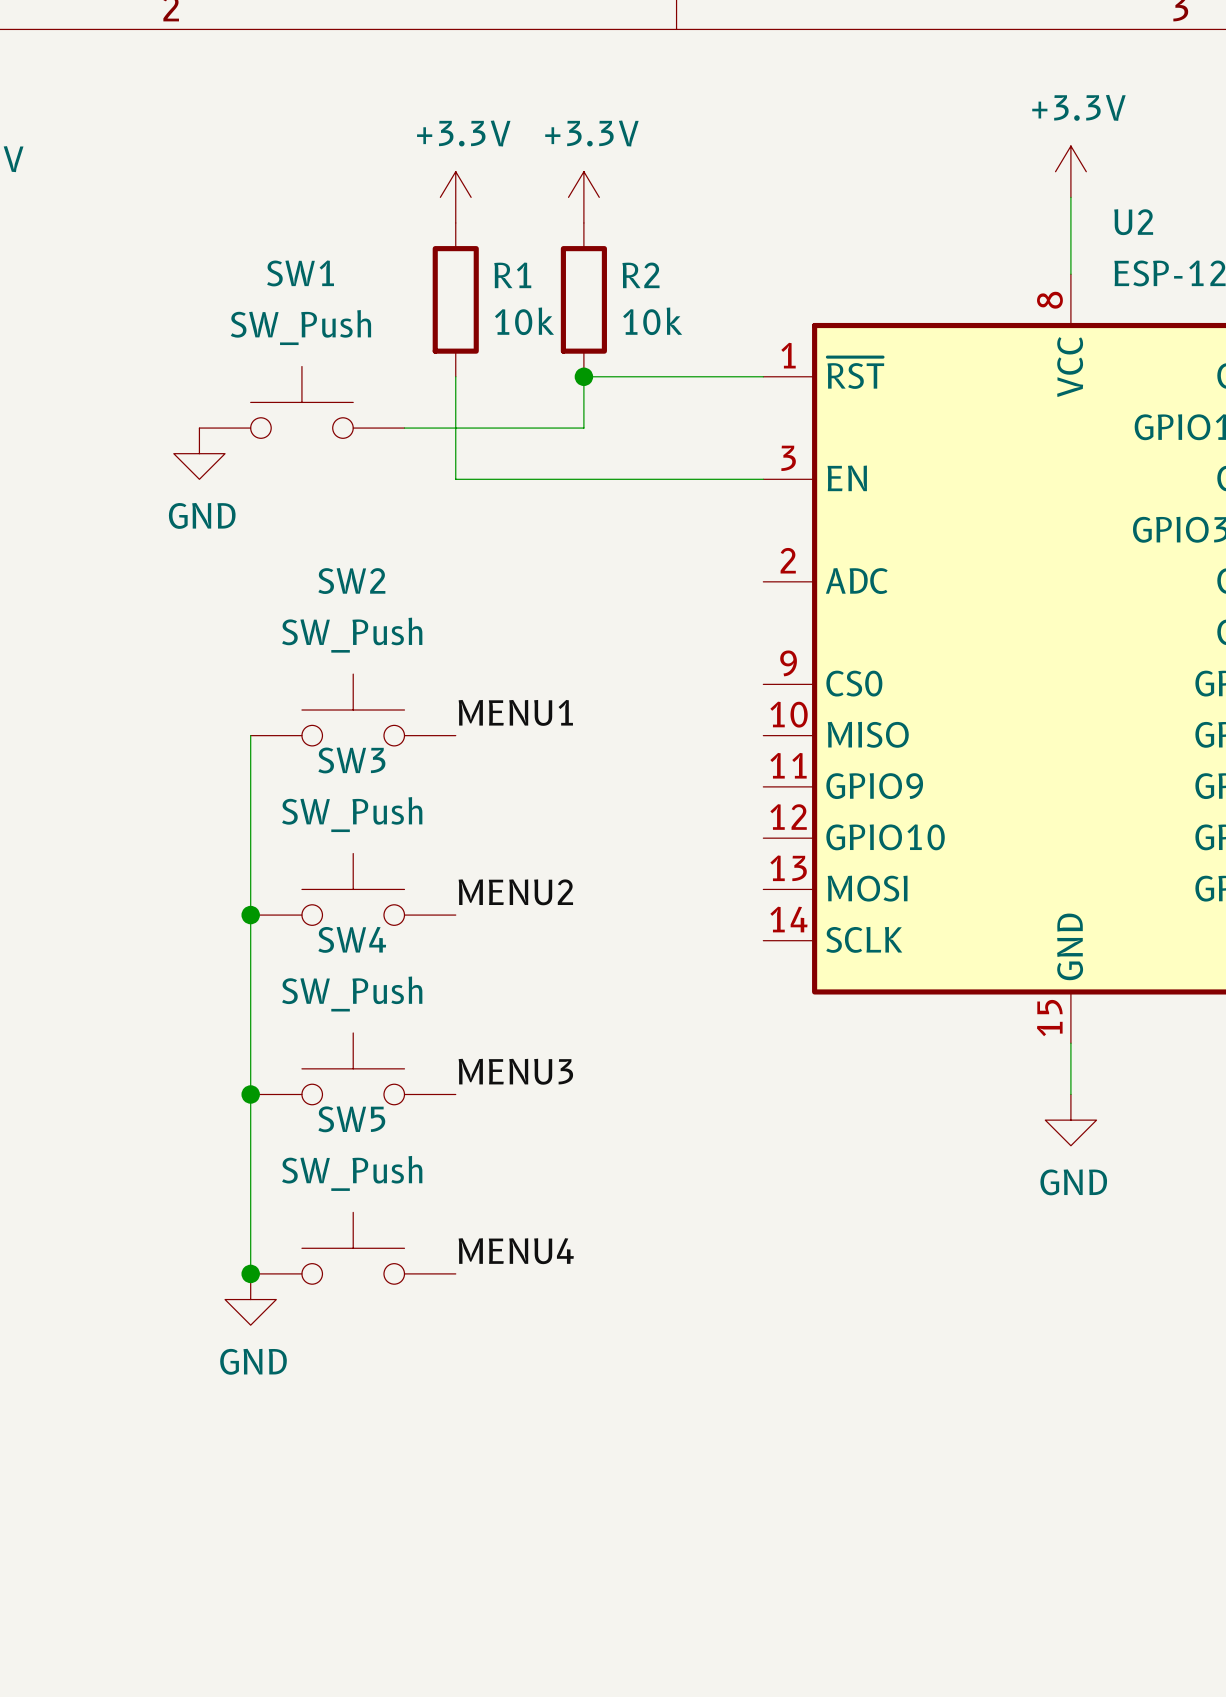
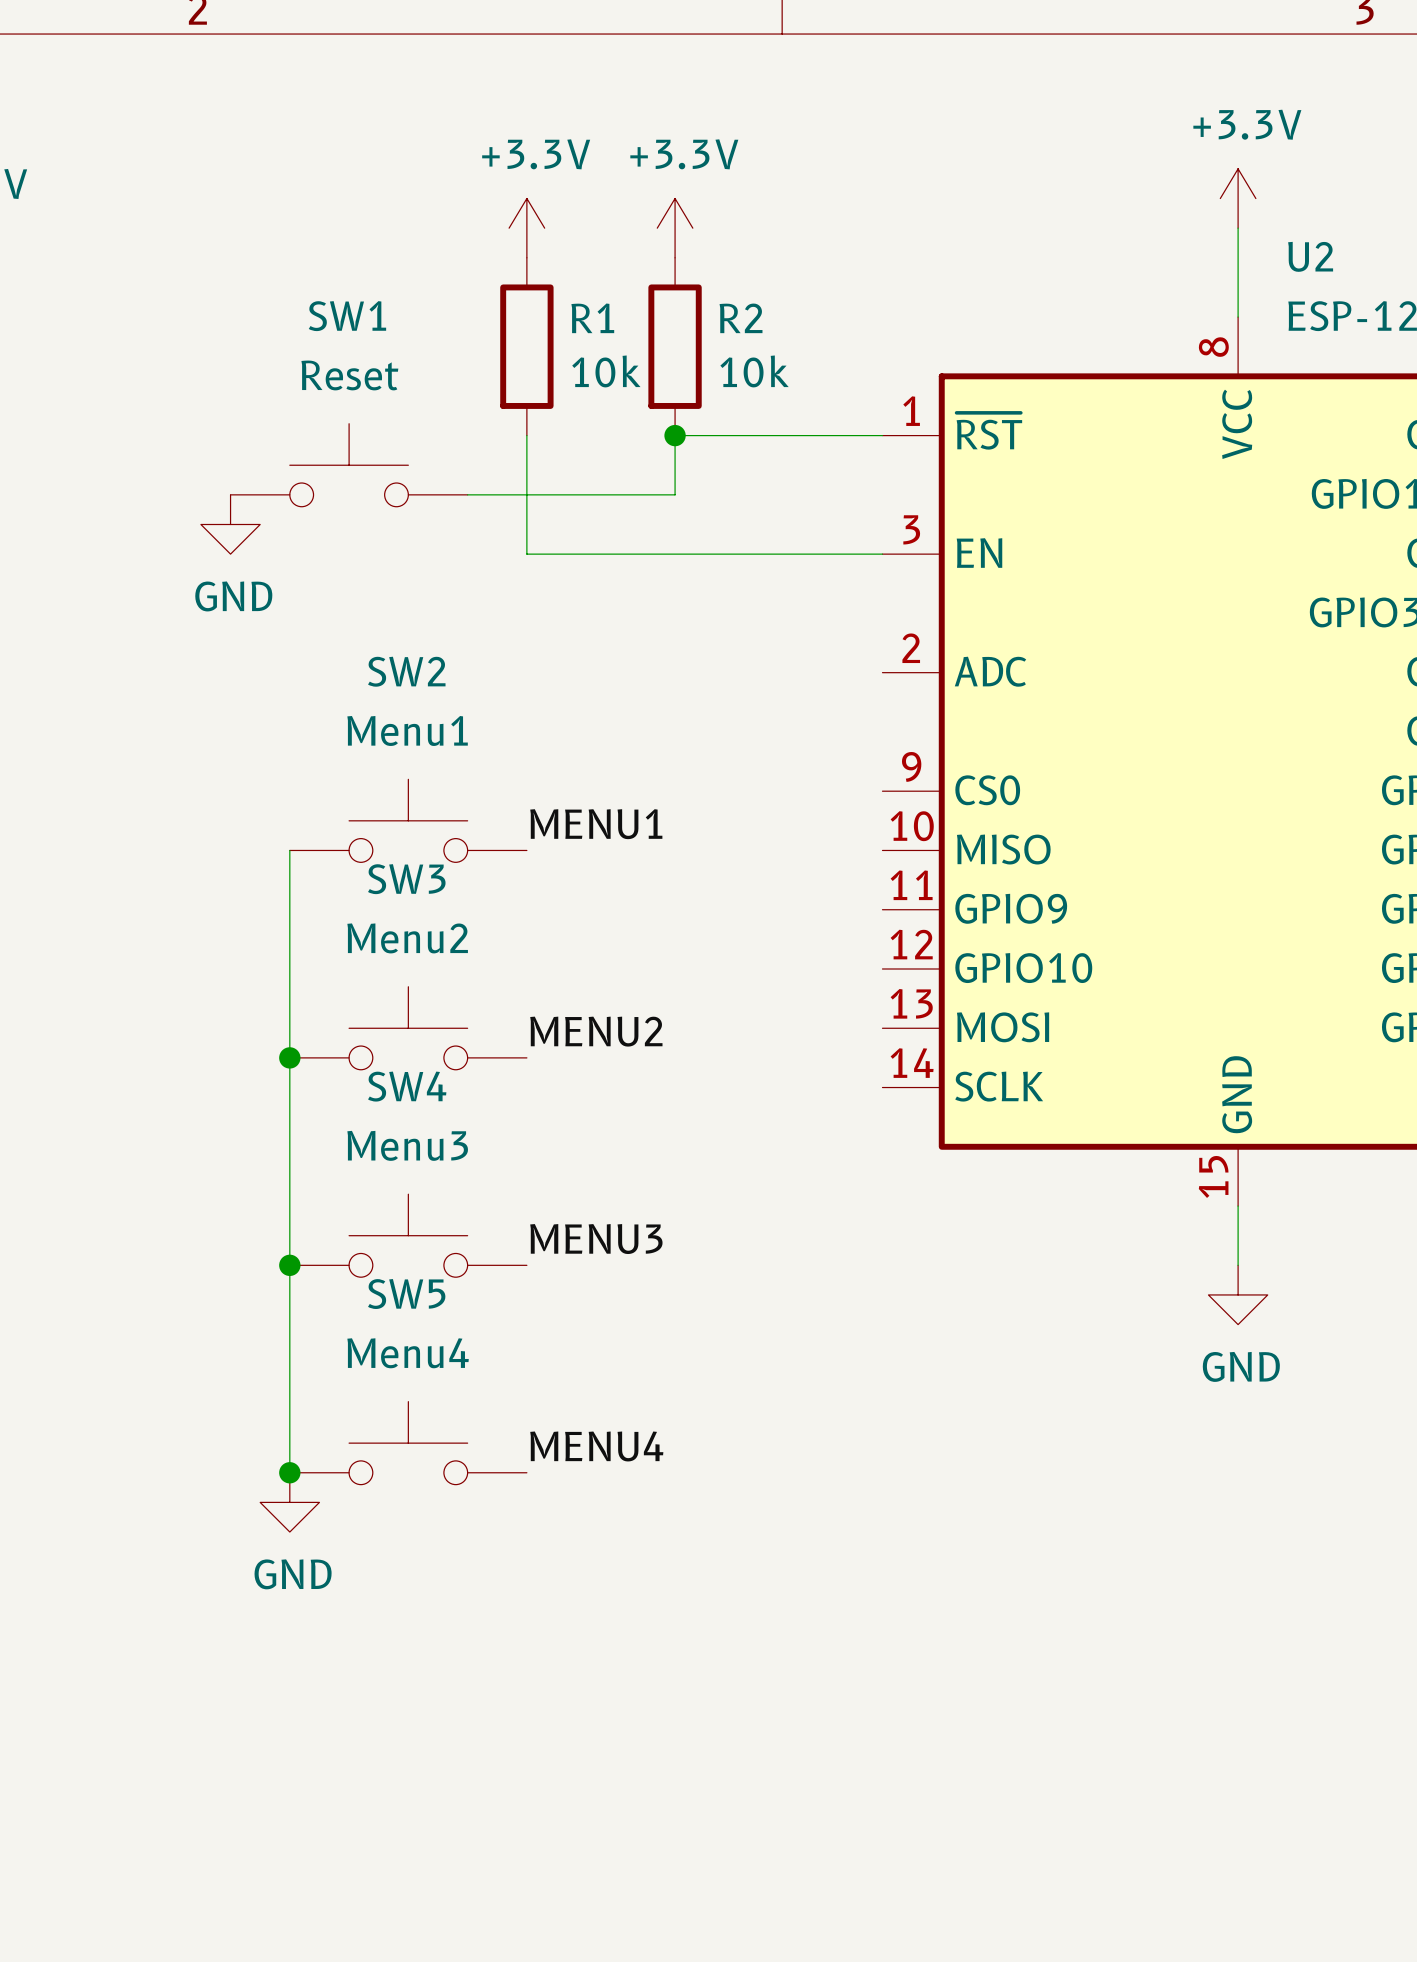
SW1 value: SW_Push (300, 327) -> Reset (349, 375)
SW2 value: SW_Push (352, 635) -> Menu1 (407, 730)
SW3 value: SW_Push (352, 814) -> Menu2 (407, 938)
SW4 value: SW_Push (352, 993) -> Menu3 (407, 1145)
SW5 value: SW_Push (352, 1173) -> Menu4 (408, 1353)

